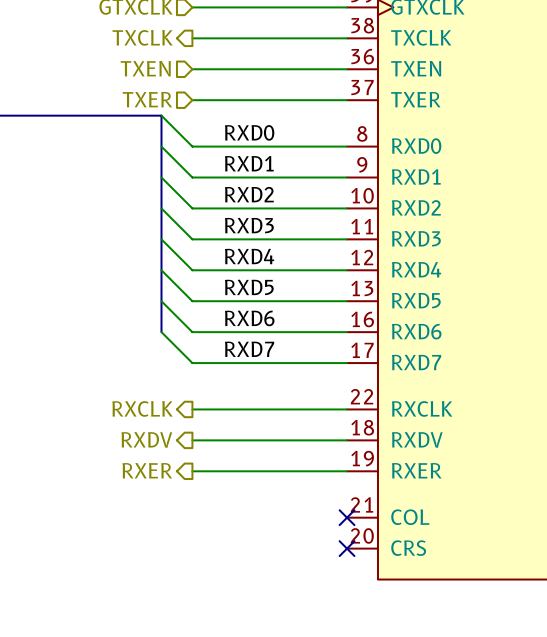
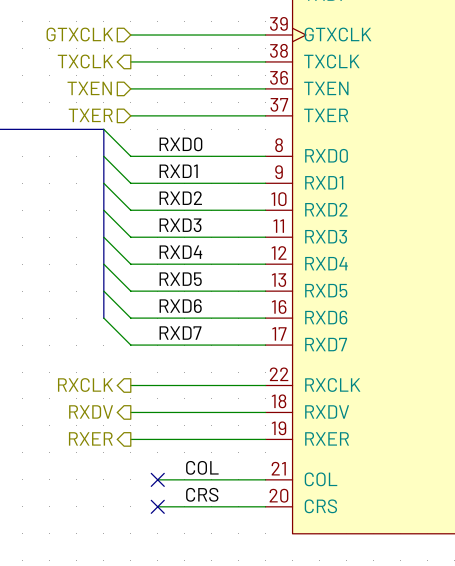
label: none -> COL (202, 467)
wire: none -> (157, 479) (265, 479)
no-connect mark: none -> (157, 479)
no-connect mark: (347, 517) -> none
label: none -> CRS (202, 494)
wire: none -> (157, 506) (265, 506)
no-connect mark: none -> (157, 506)
no-connect mark: (347, 548) -> none

